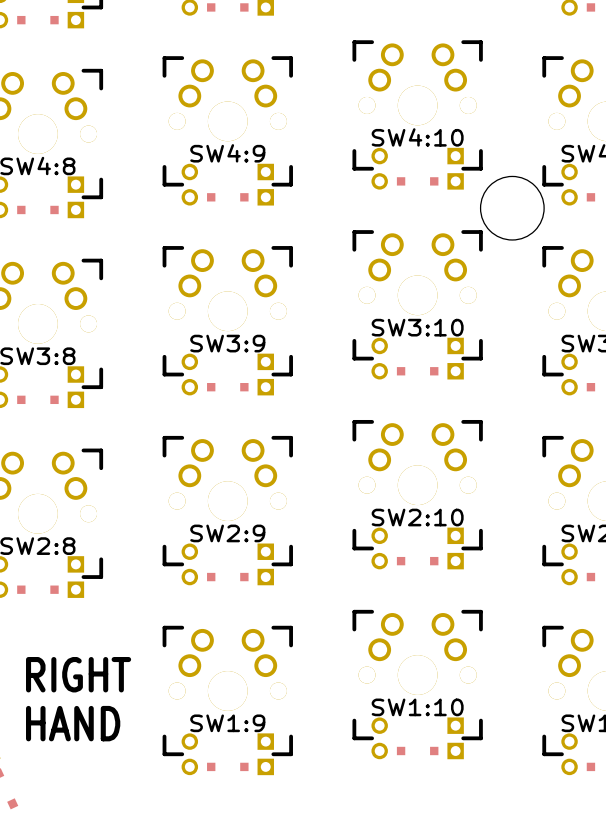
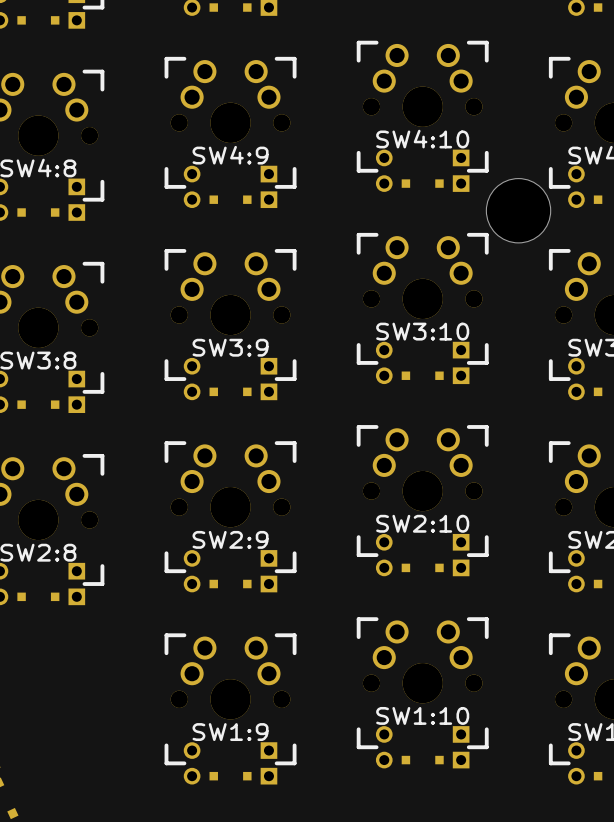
text: RIGHT (78, 674) -> none
text: HAND (73, 723) -> none

